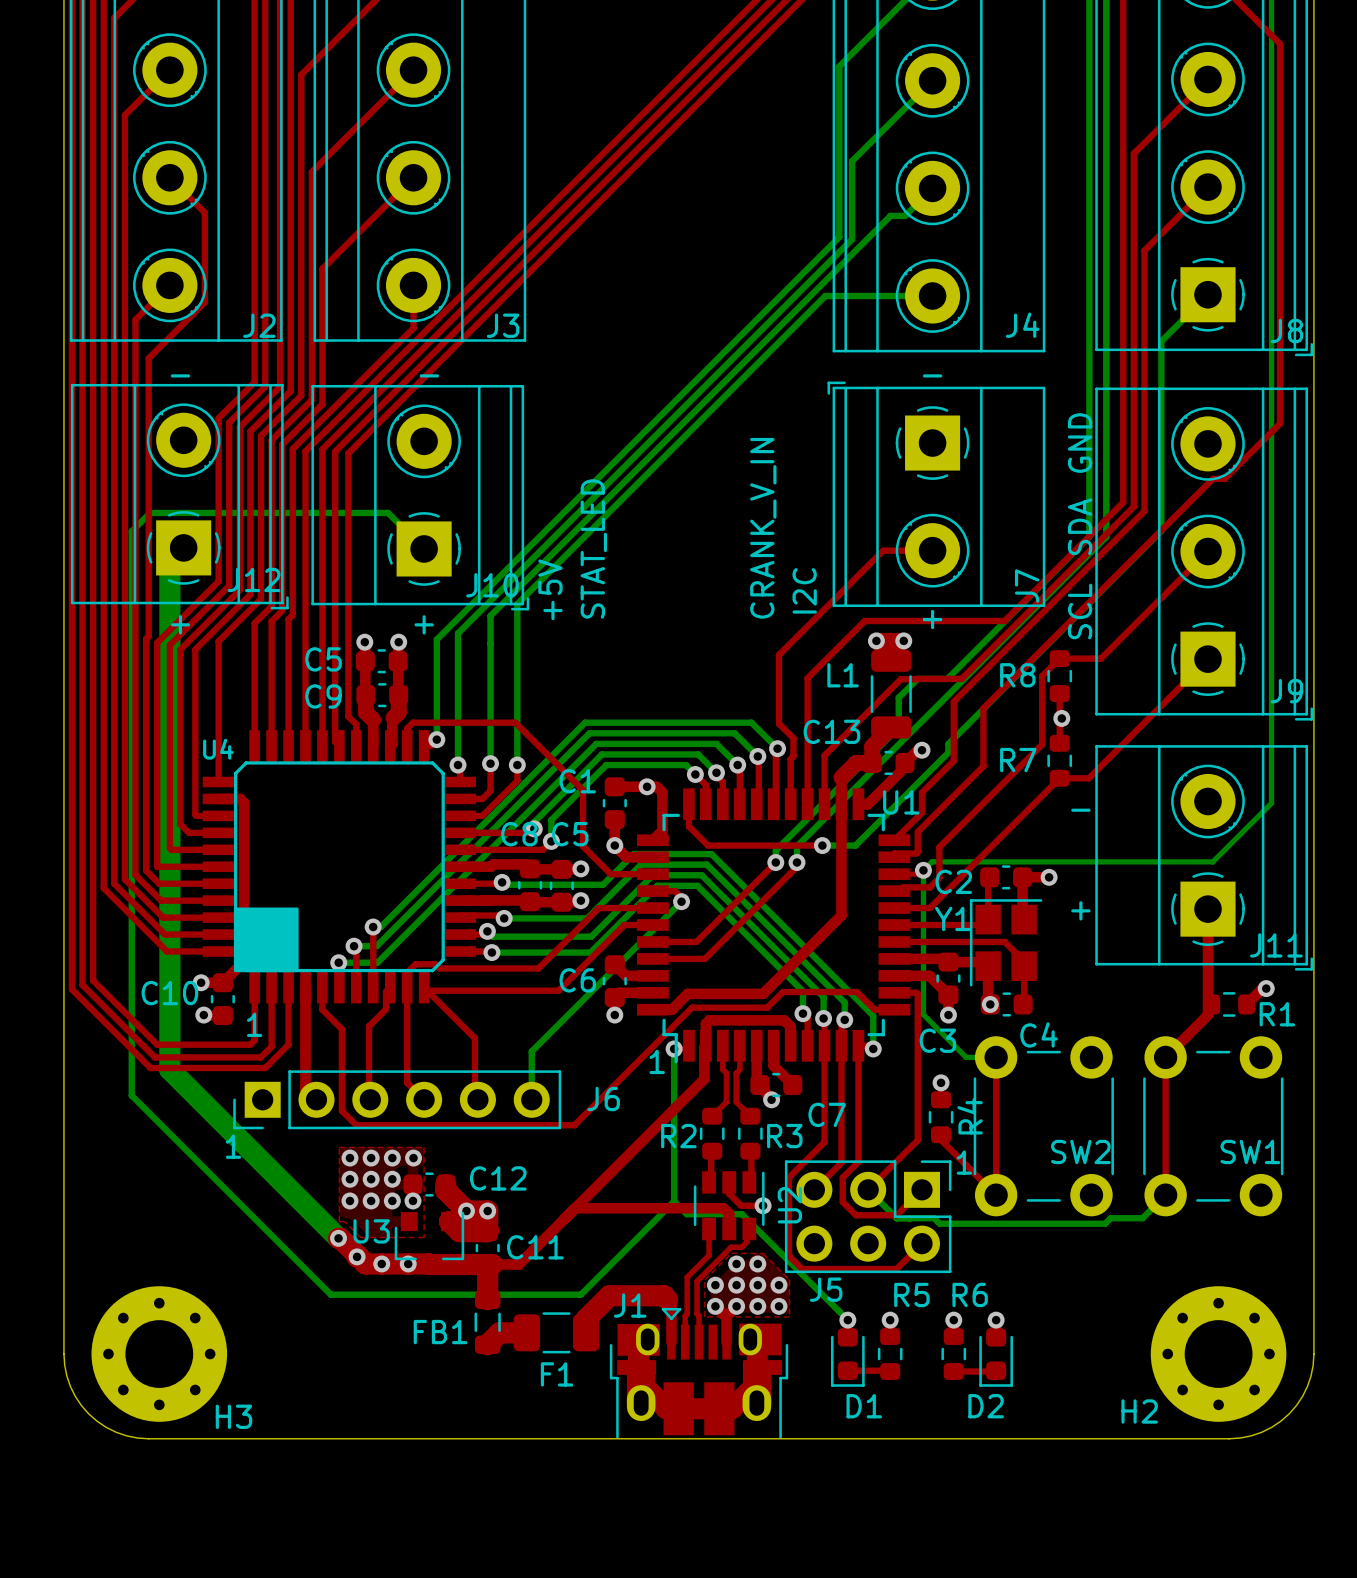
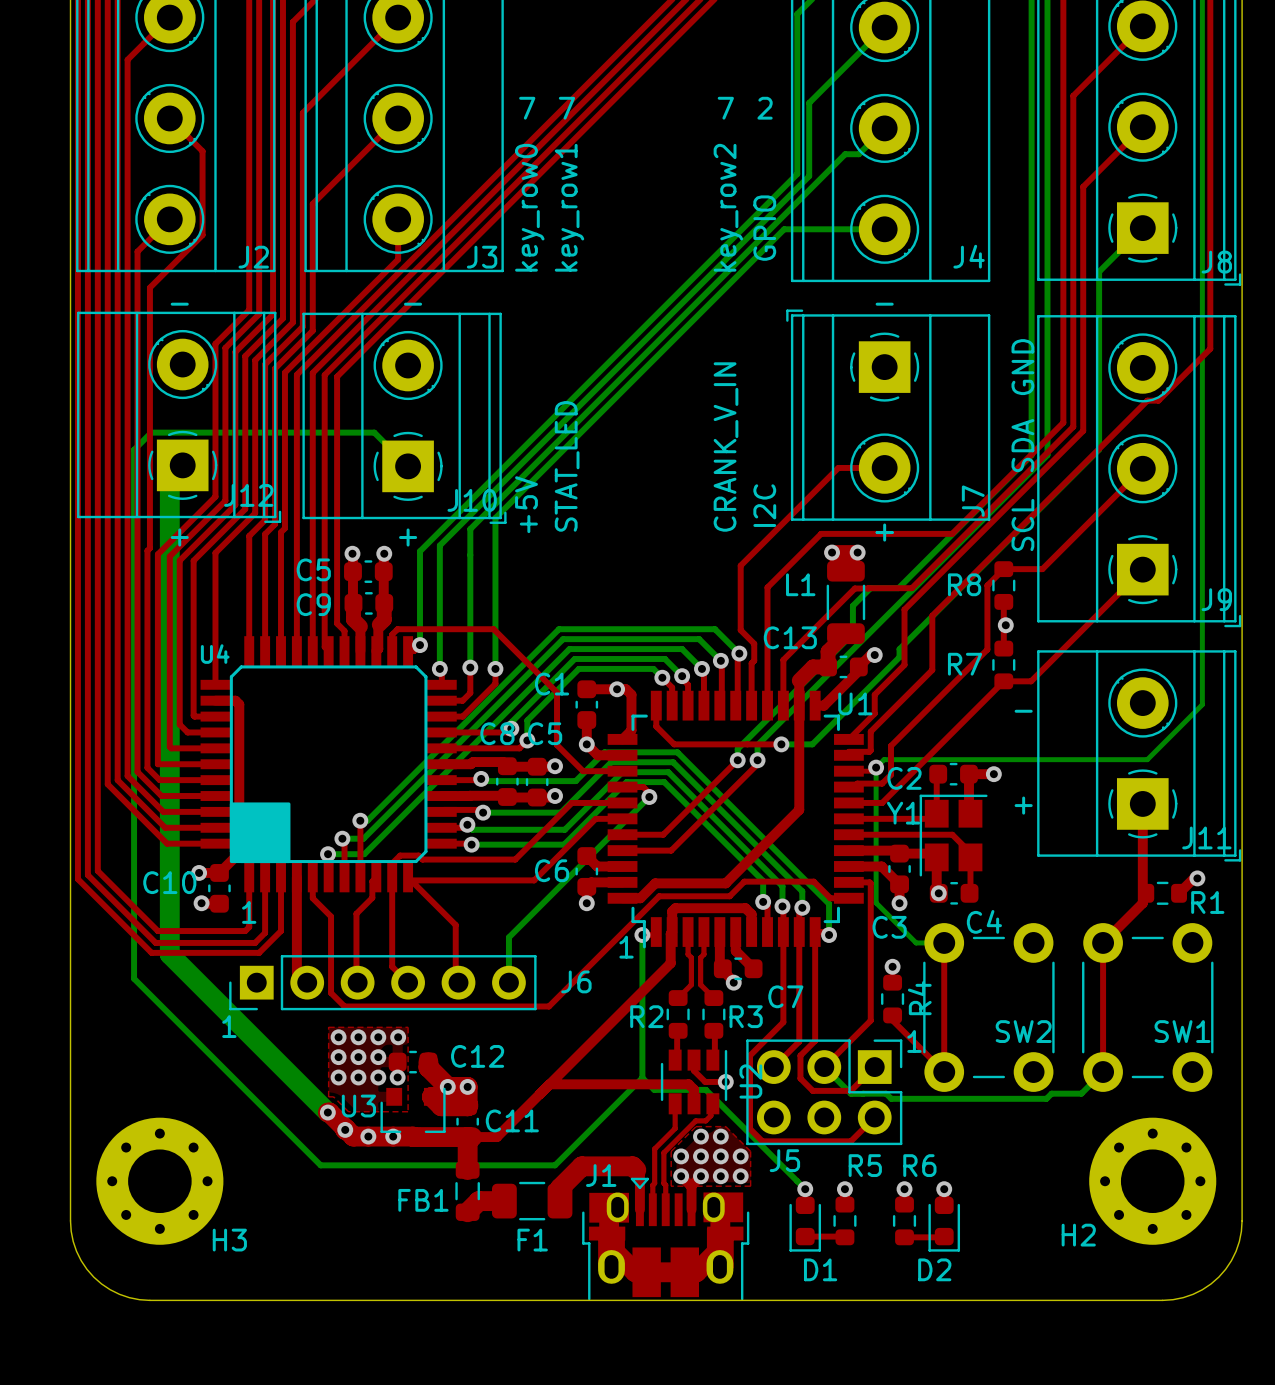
text: none -> 7 (527, 108)
text: none -> 7 (566, 108)
text: none -> 7 (725, 108)
text: none -> 2 (765, 108)
text: none -> key_row0 (529, 207)
text: none -> key_row1 (569, 207)
text: none -> key_row2 (728, 207)
text: none -> GPIO (764, 228)
H3 position: (159, 1354) -> (159, 1181)
H2 position: (1218, 1354) -> (1152, 1181)

